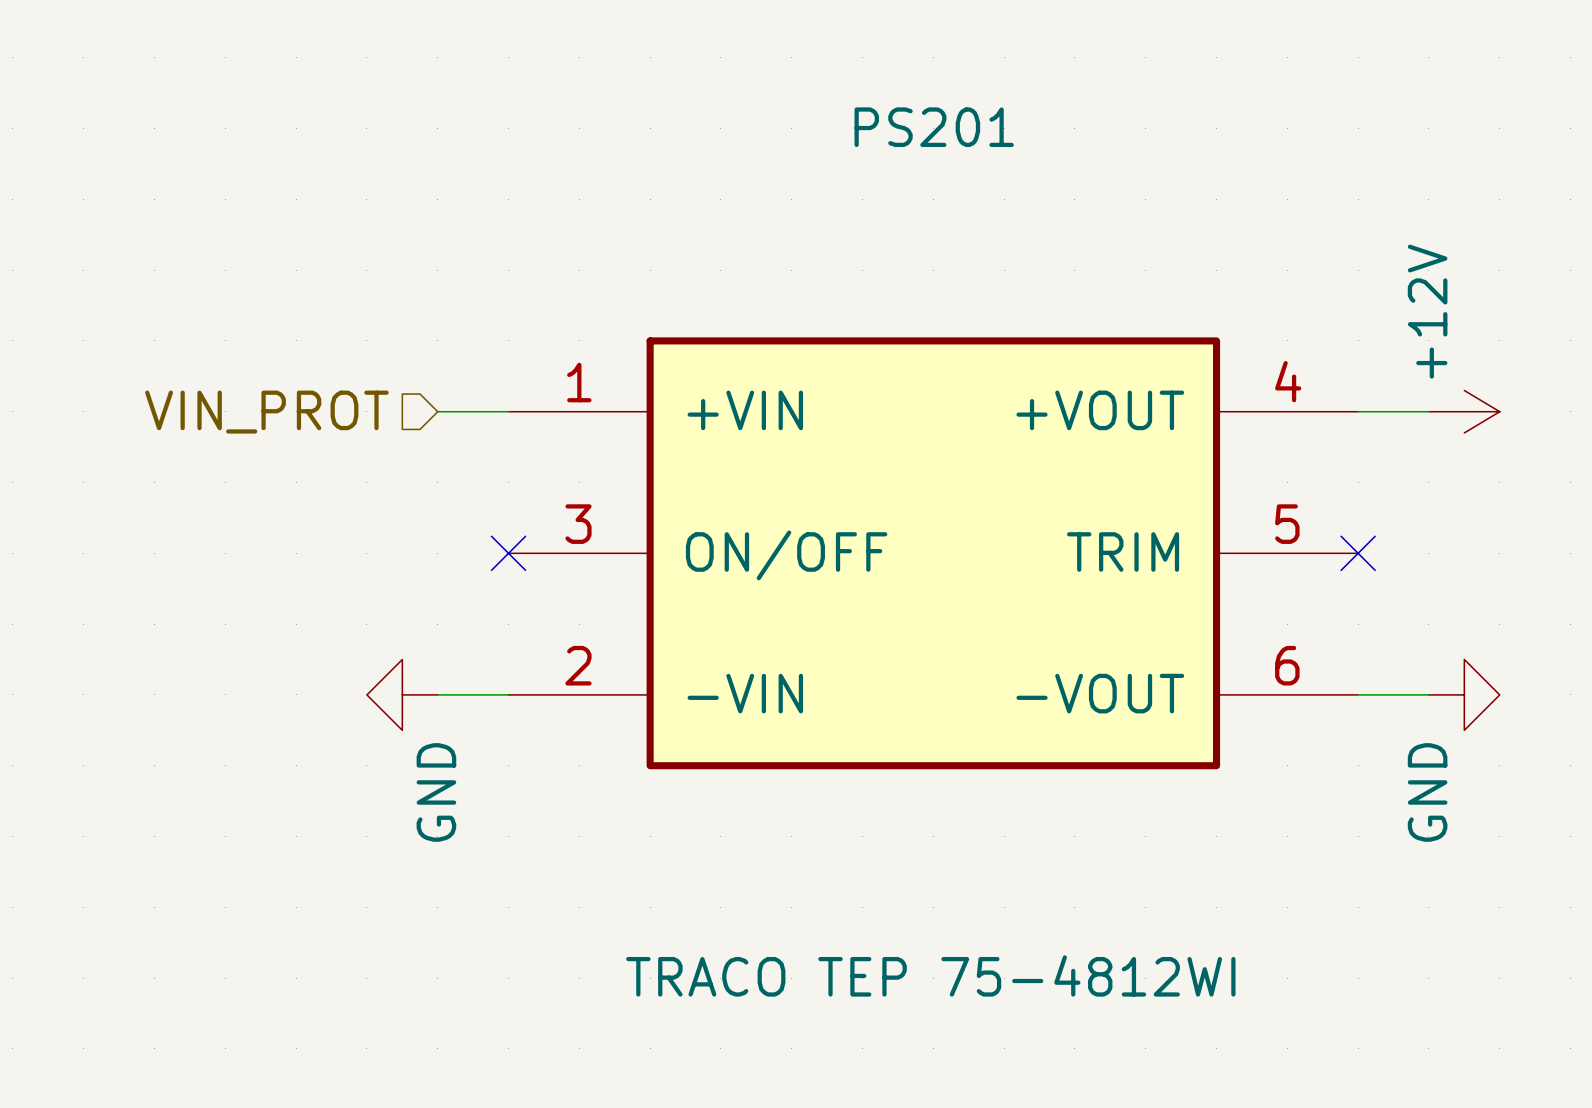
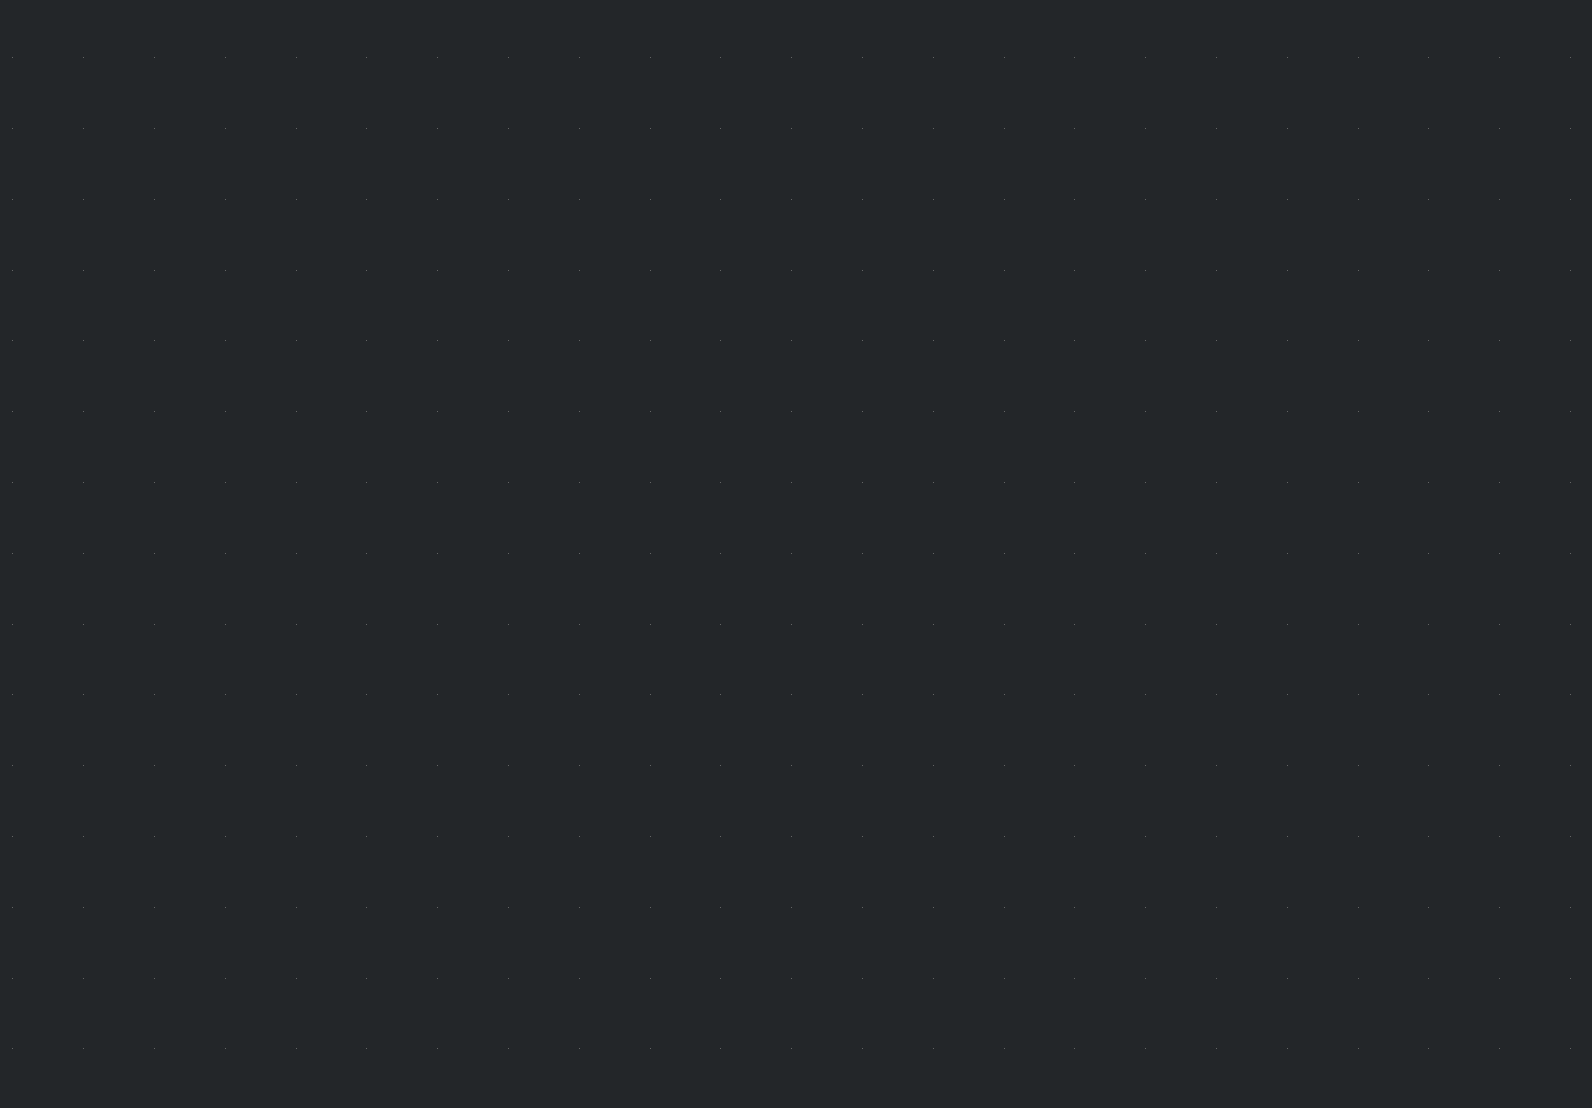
wire: (437, 411) (508, 411) -> none
wire: (1358, 411) (1428, 411) -> none
power symbol: +12V (1464, 411) -> none
hierarchical label: VIN_PROT (266, 412) -> none
no-connect mark: (508, 553) -> none
PS201: TRACO TEP 75-4812WI (933, 553) -> none
no-connect mark: (1358, 553) -> none
power symbol: GND (402, 694) -> none
wire: (437, 694) (508, 694) -> none
wire: (1358, 694) (1428, 694) -> none
power symbol: GND (1464, 694) -> none

